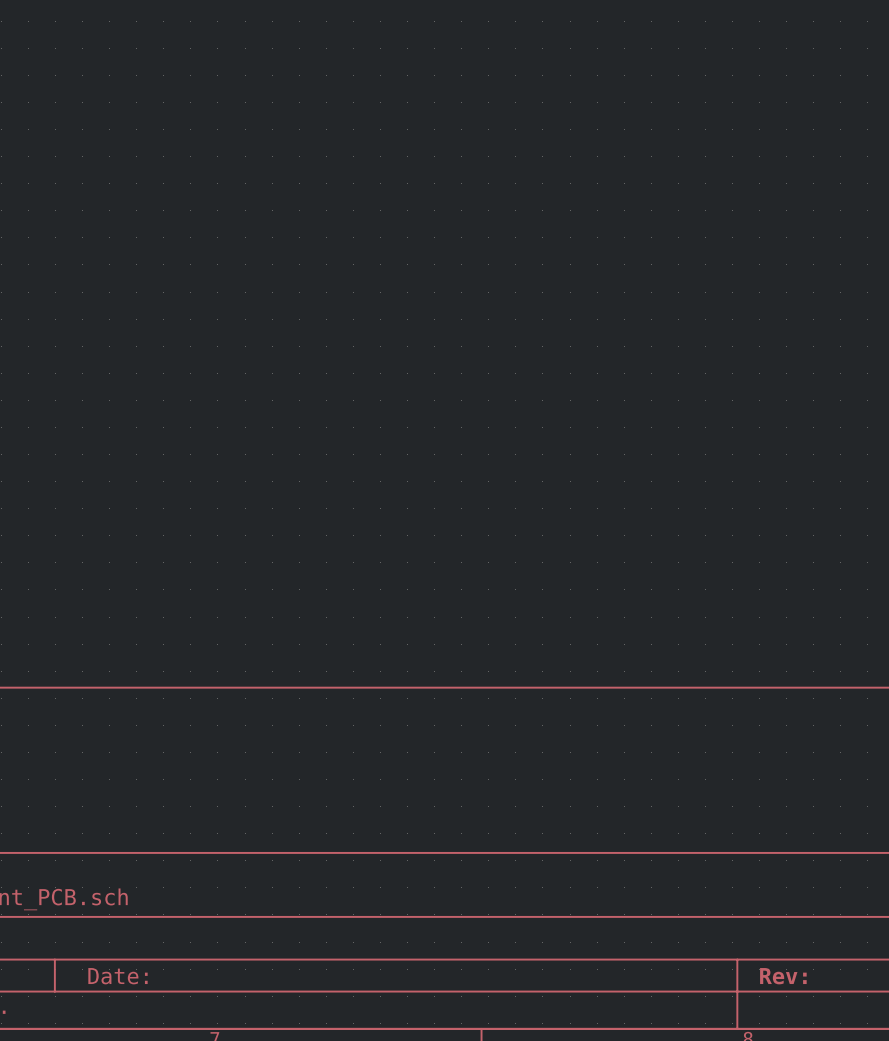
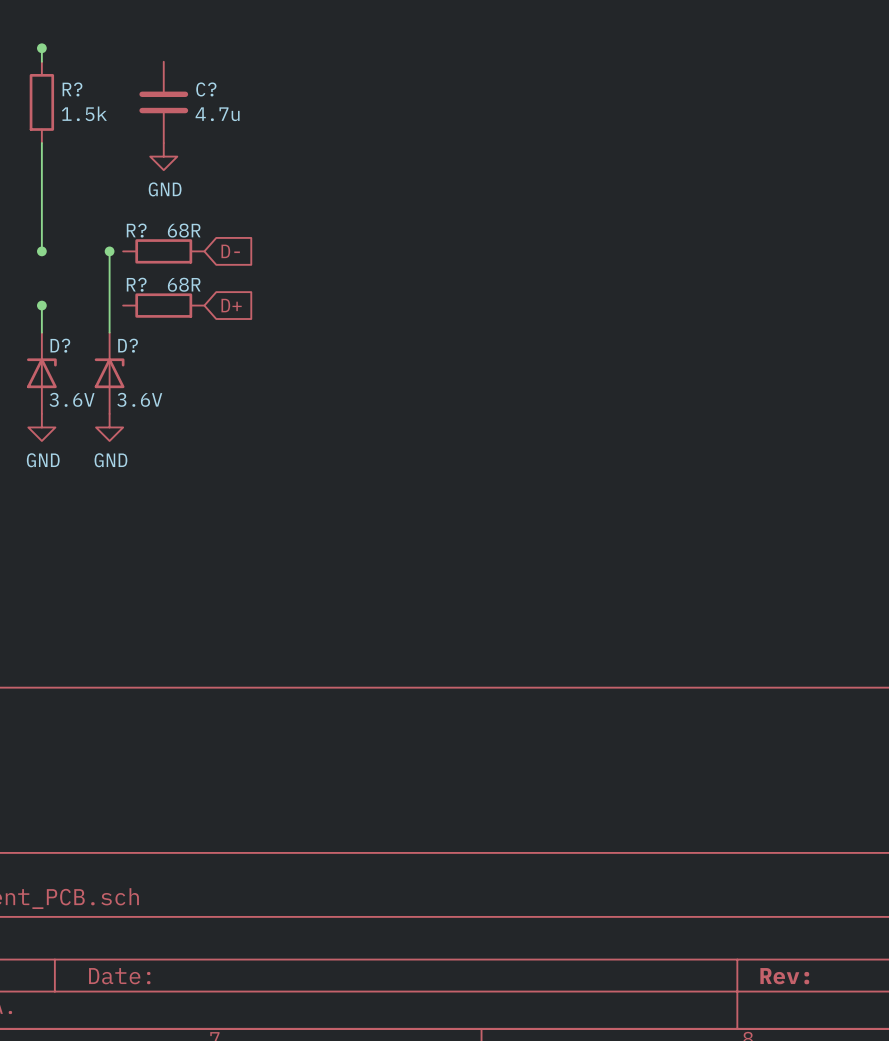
wire: none -> (41, 48) (41, 61)
junction: none -> (41, 48)
R?: none -> 1.5k (41, 102)
C?: none -> 4.7u (163, 102)
wire: none -> (41, 143) (41, 251)
power symbol: none -> GND (163, 156)
junction: none -> (41, 251)
wire: none -> (109, 251) (109, 332)
junction: none -> (109, 251)
R?: none -> 68R (163, 251)
global label: none -> D- (230, 251)
wire: none -> (41, 305) (41, 332)
junction: none -> (41, 305)
R?: none -> 68R (163, 305)
global label: none -> D+ (231, 305)
D?: none -> 3.6V (41, 373)
D?: none -> 3.6V (109, 373)
power symbol: none -> GND (41, 427)
power symbol: none -> GND (109, 427)

